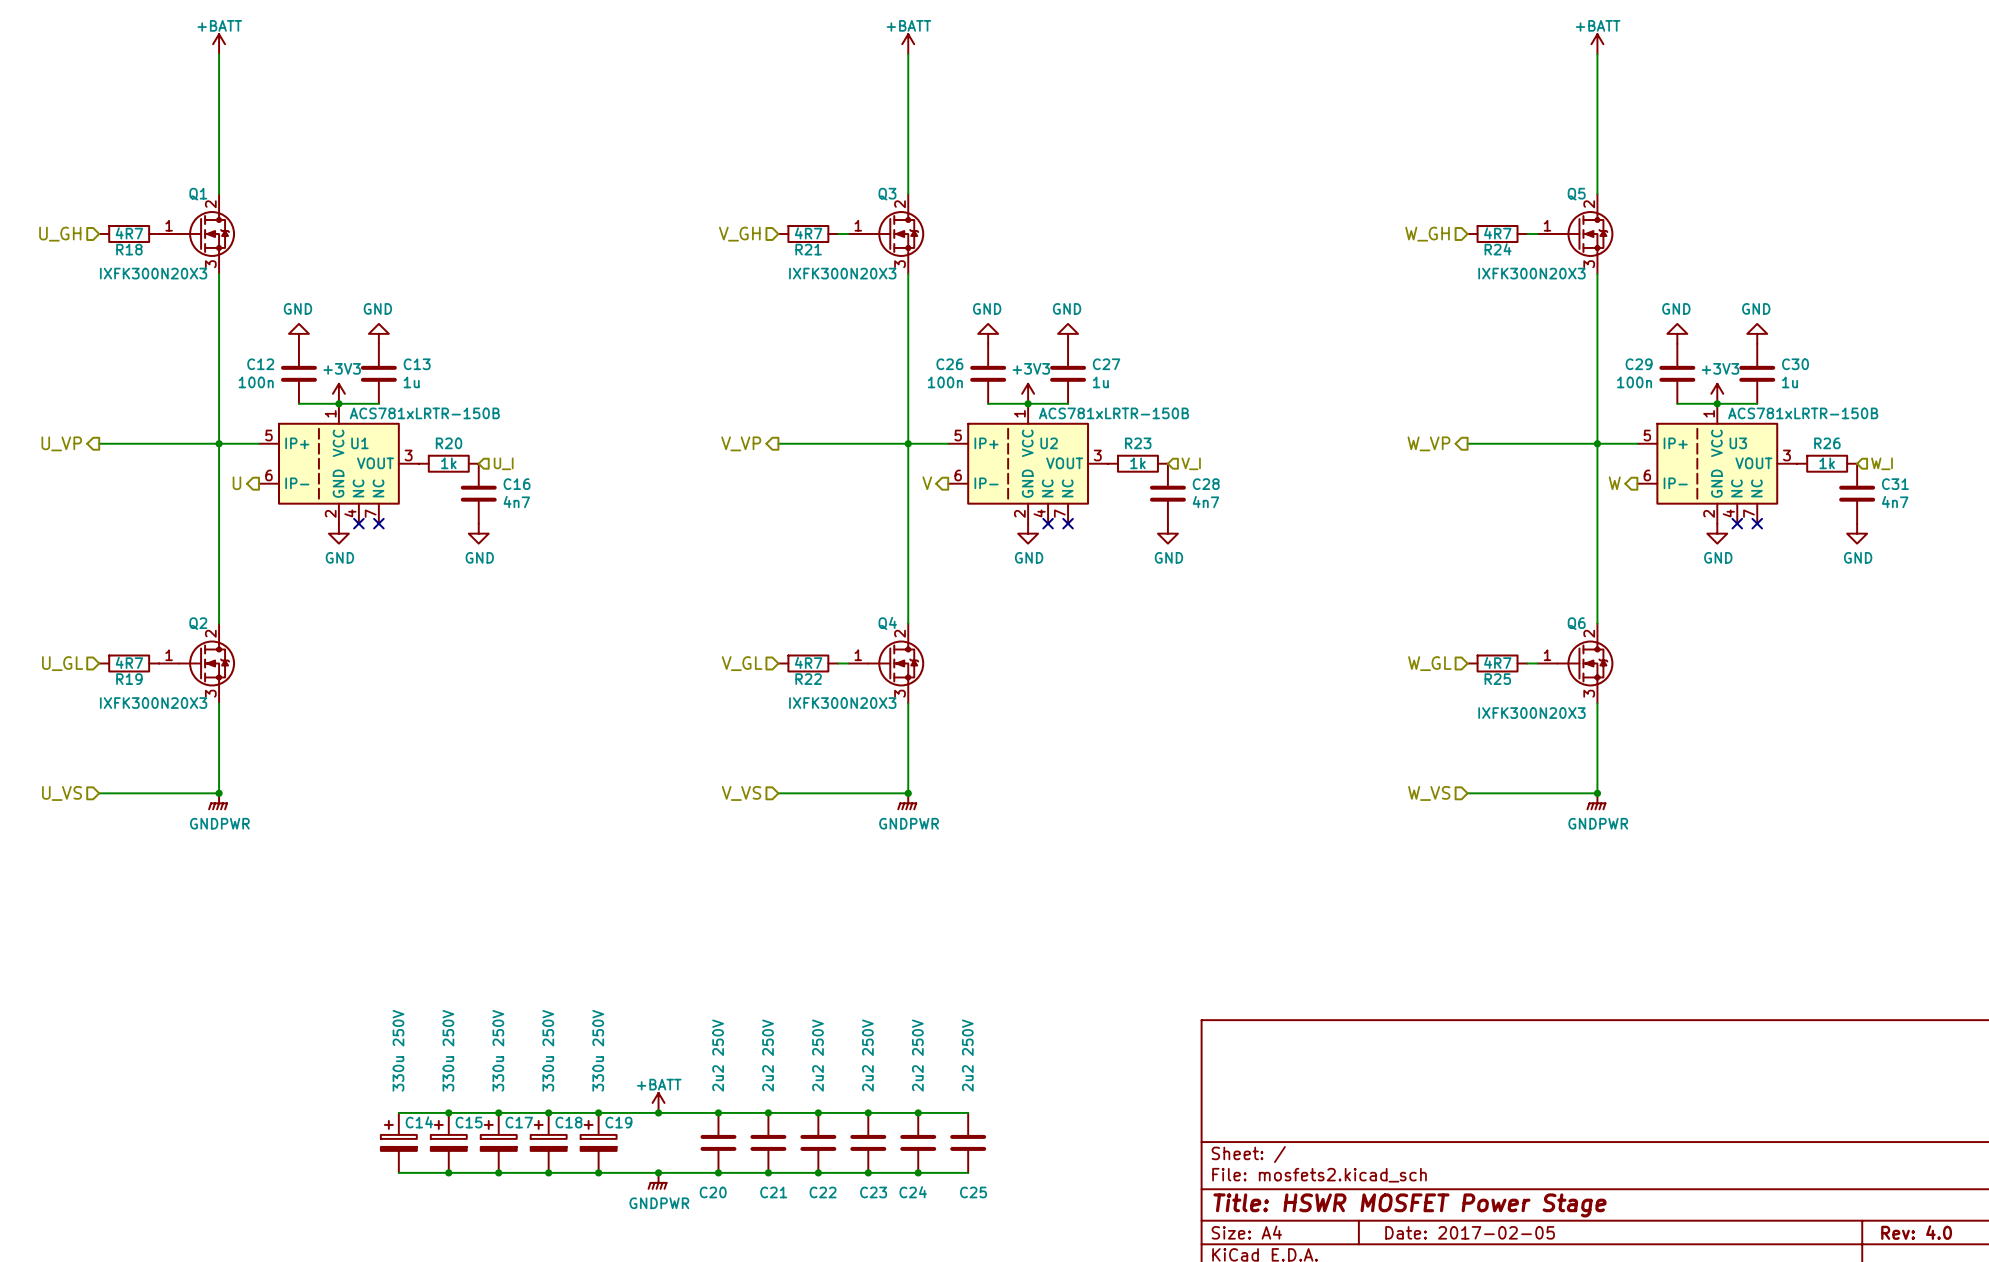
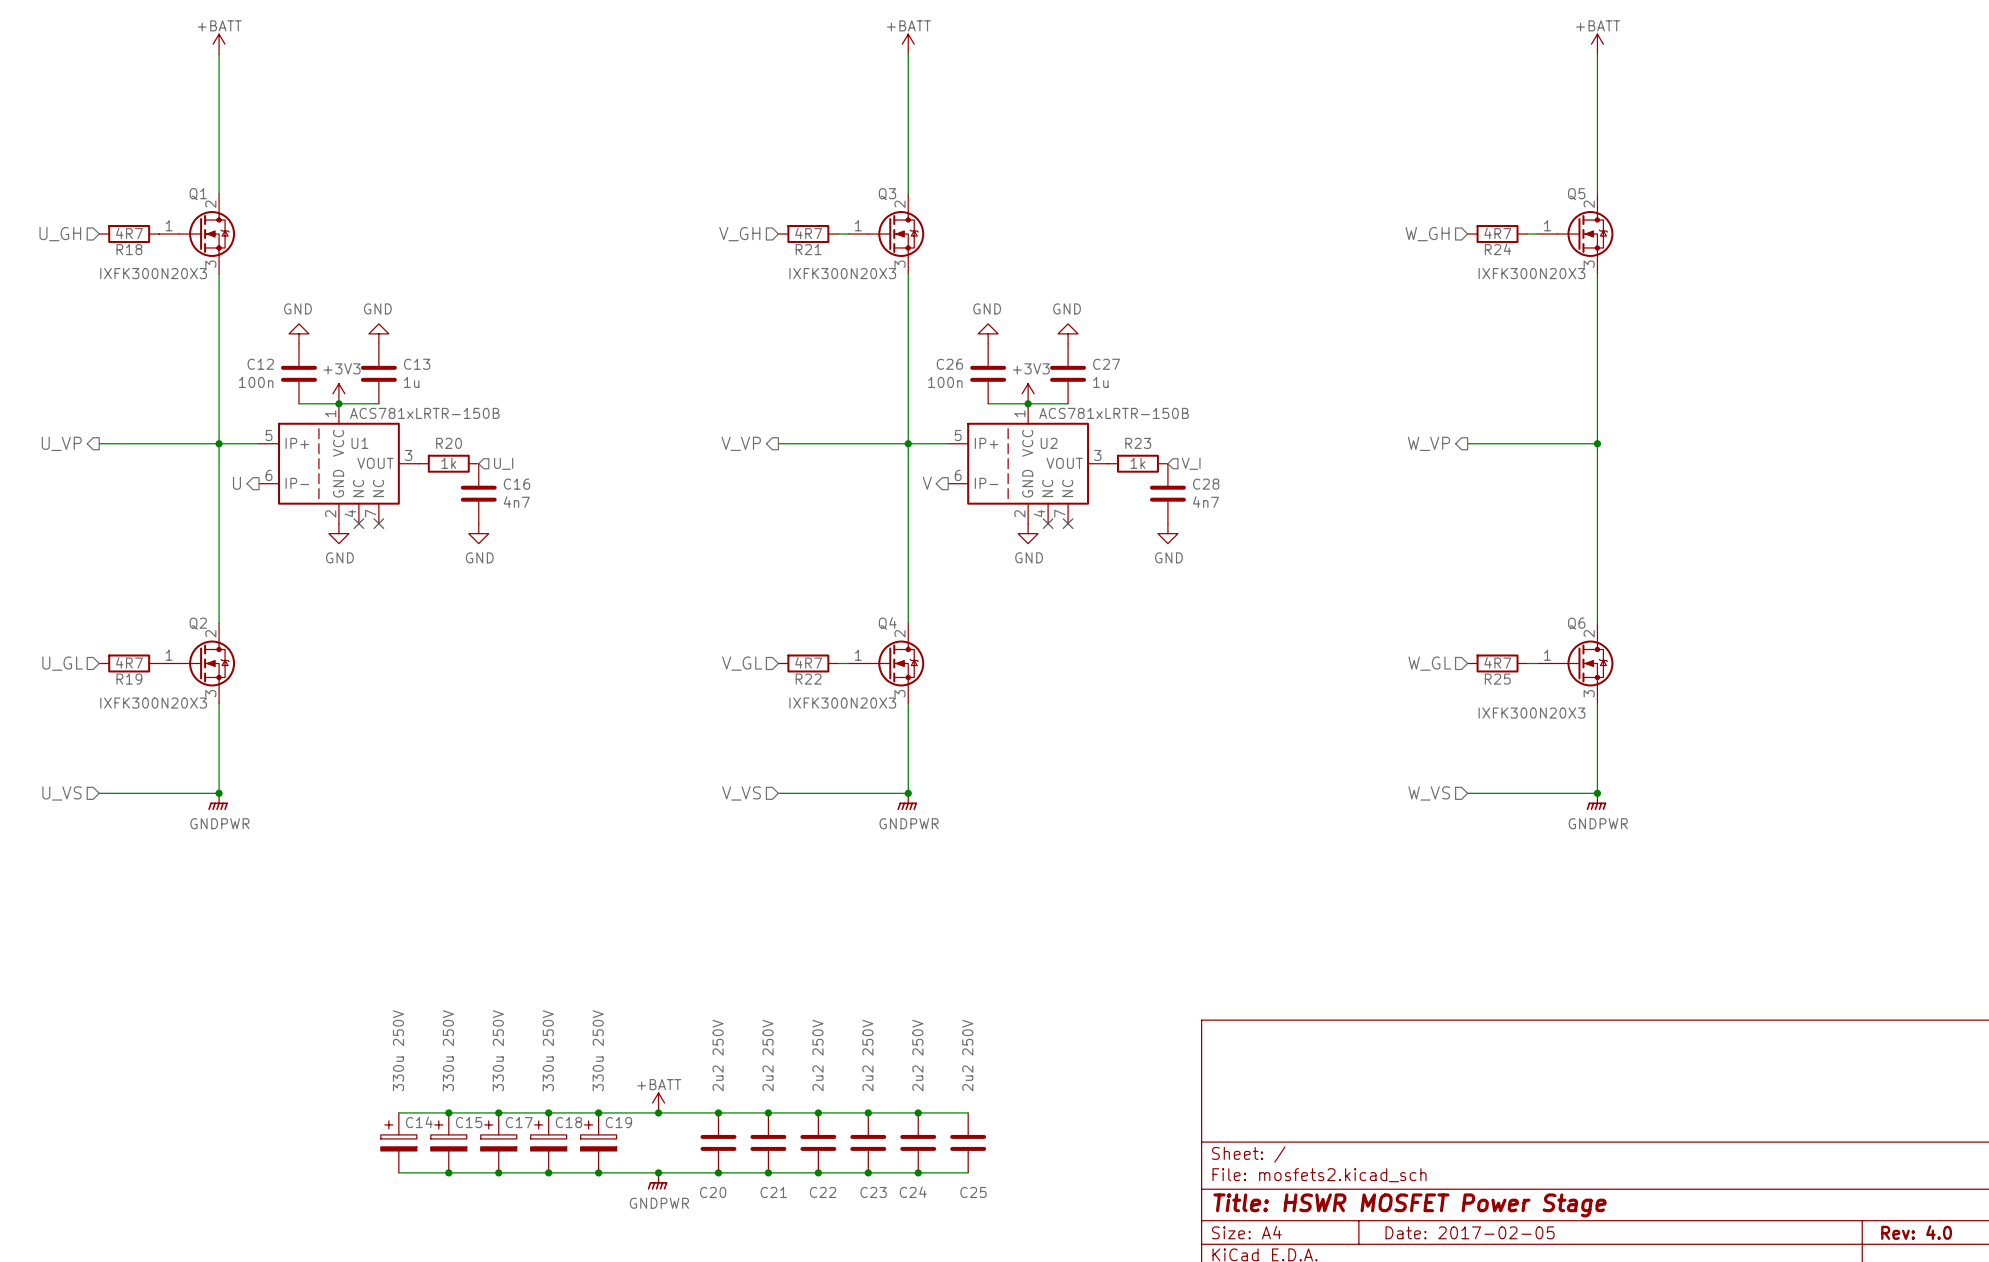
power symbol: GND (1677, 333) -> none
power symbol: GND (1757, 333) -> none
C29: 100n (1677, 373) -> none
C30: 1u (1757, 373) -> none
power symbol: +3V3 (1717, 393) -> none
wire: (1677, 403) (1757, 403) -> none
junction: (1717, 403) -> none
wire: (1597, 443) (1637, 443) -> none
U3: ACS781xLRTR-150B (1717, 463) -> none
R26: 1k (1827, 463) -> none
hierarchical label: W_I (1882, 463) -> none
hierarchical label: W (1614, 483) -> none
C31: 4n7 (1857, 493) -> none
no-connect mark: (1737, 523) -> none
no-connect mark: (1757, 523) -> none
power symbol: GND (1717, 533) -> none
power symbol: GND (1857, 533) -> none

